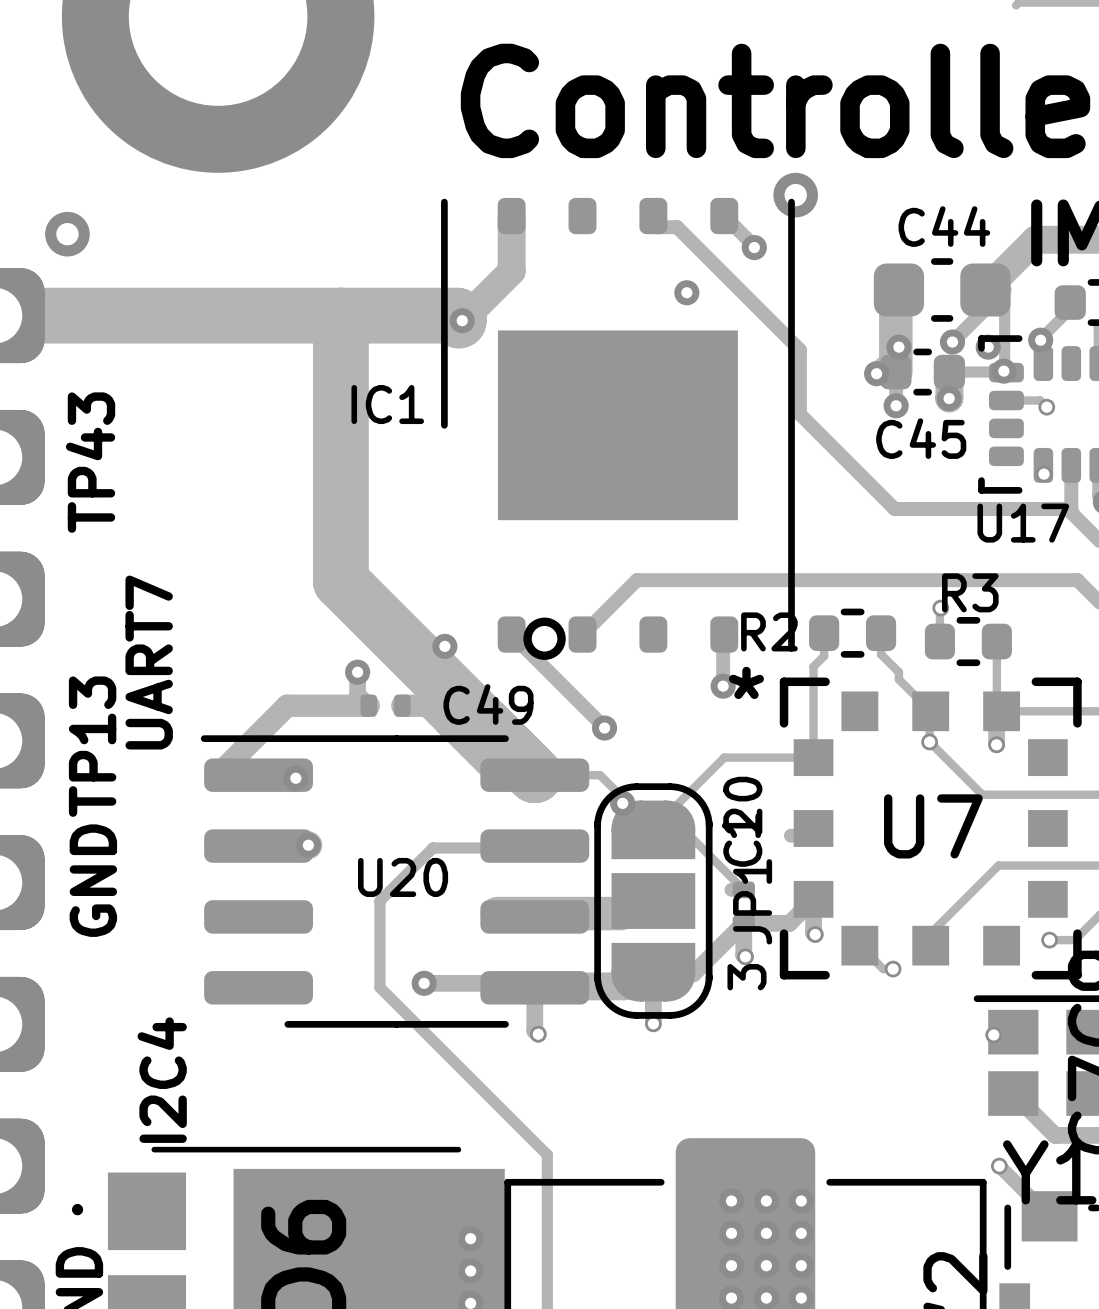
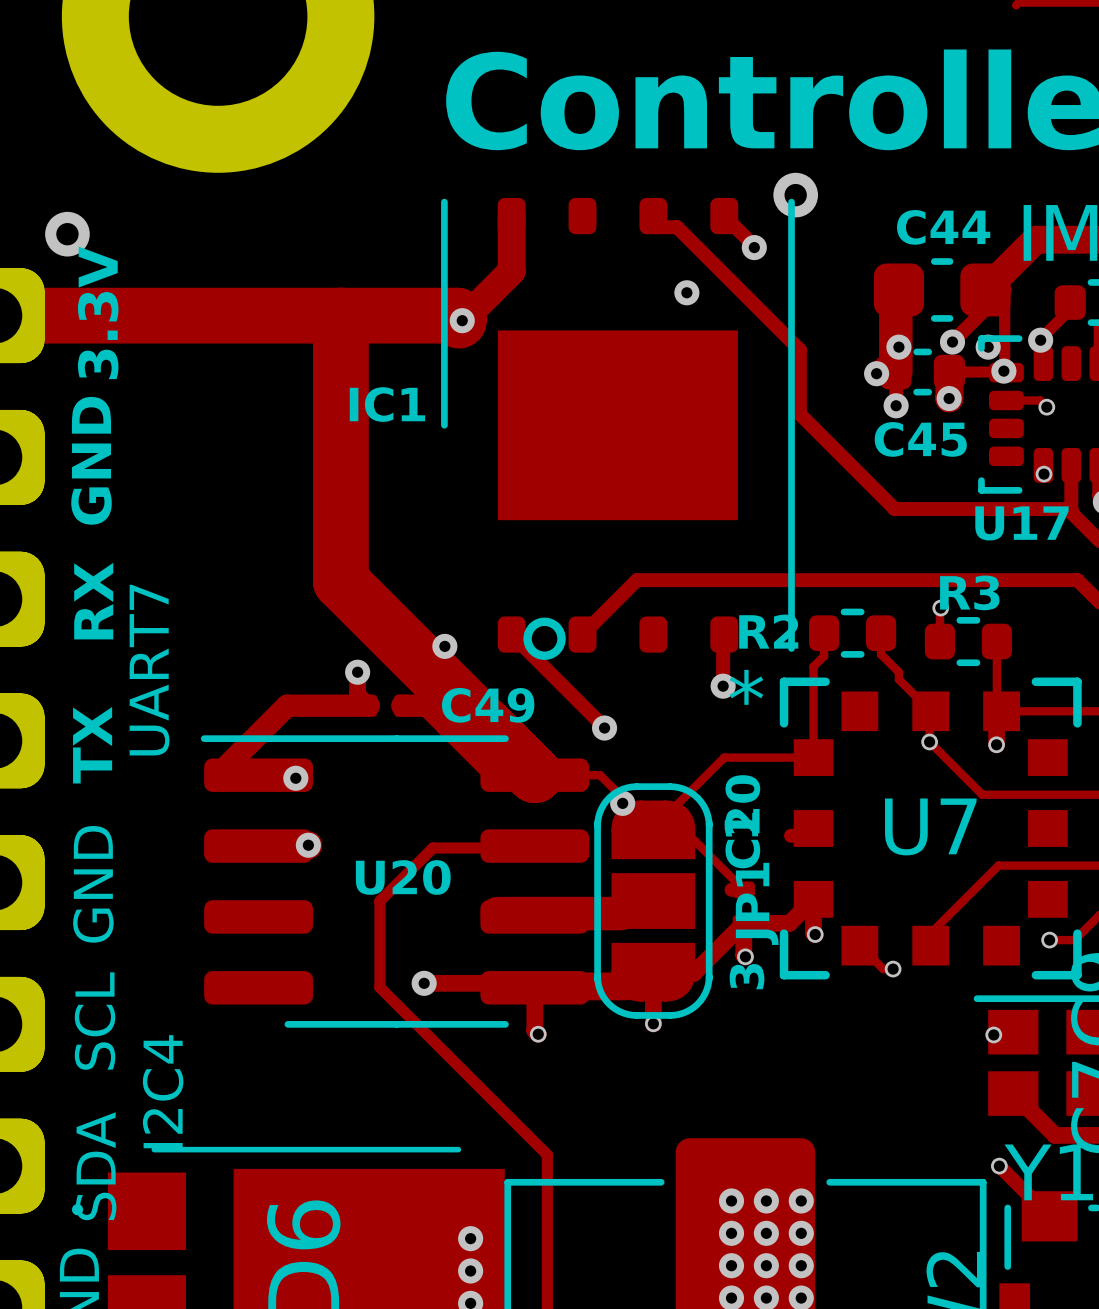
3.3V name: none -> 3.3V (98, 312)
TP43 name: TP43 (90, 462) -> GND (91, 460)
RX name: none -> RX (93, 601)
TP13 name: TP13 (92, 746) -> TX (92, 745)
SCL name: none -> SCL (95, 1021)
SDA name: none -> SDA (96, 1166)

